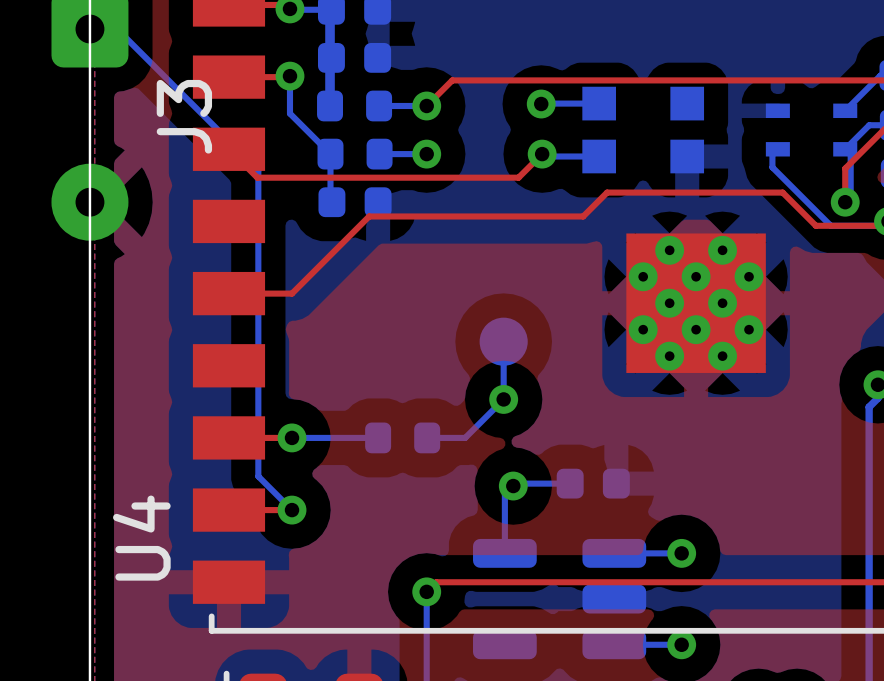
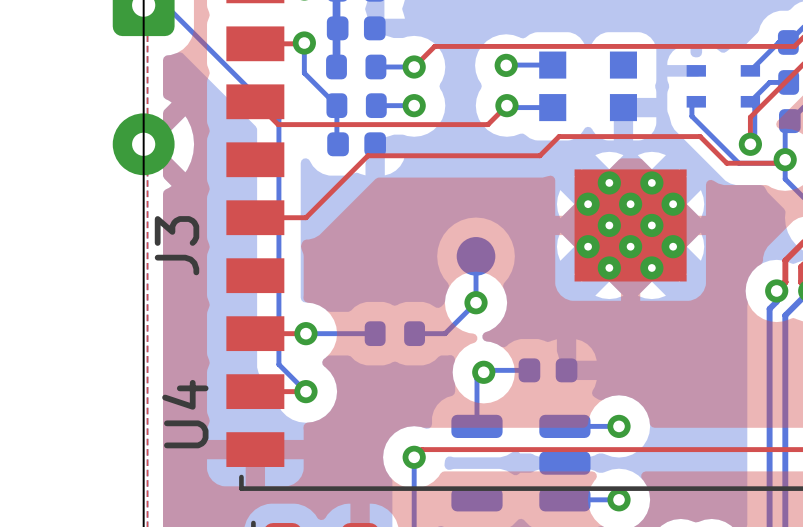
J3 name position: J3 (184, 116) -> J3 (177, 245)

